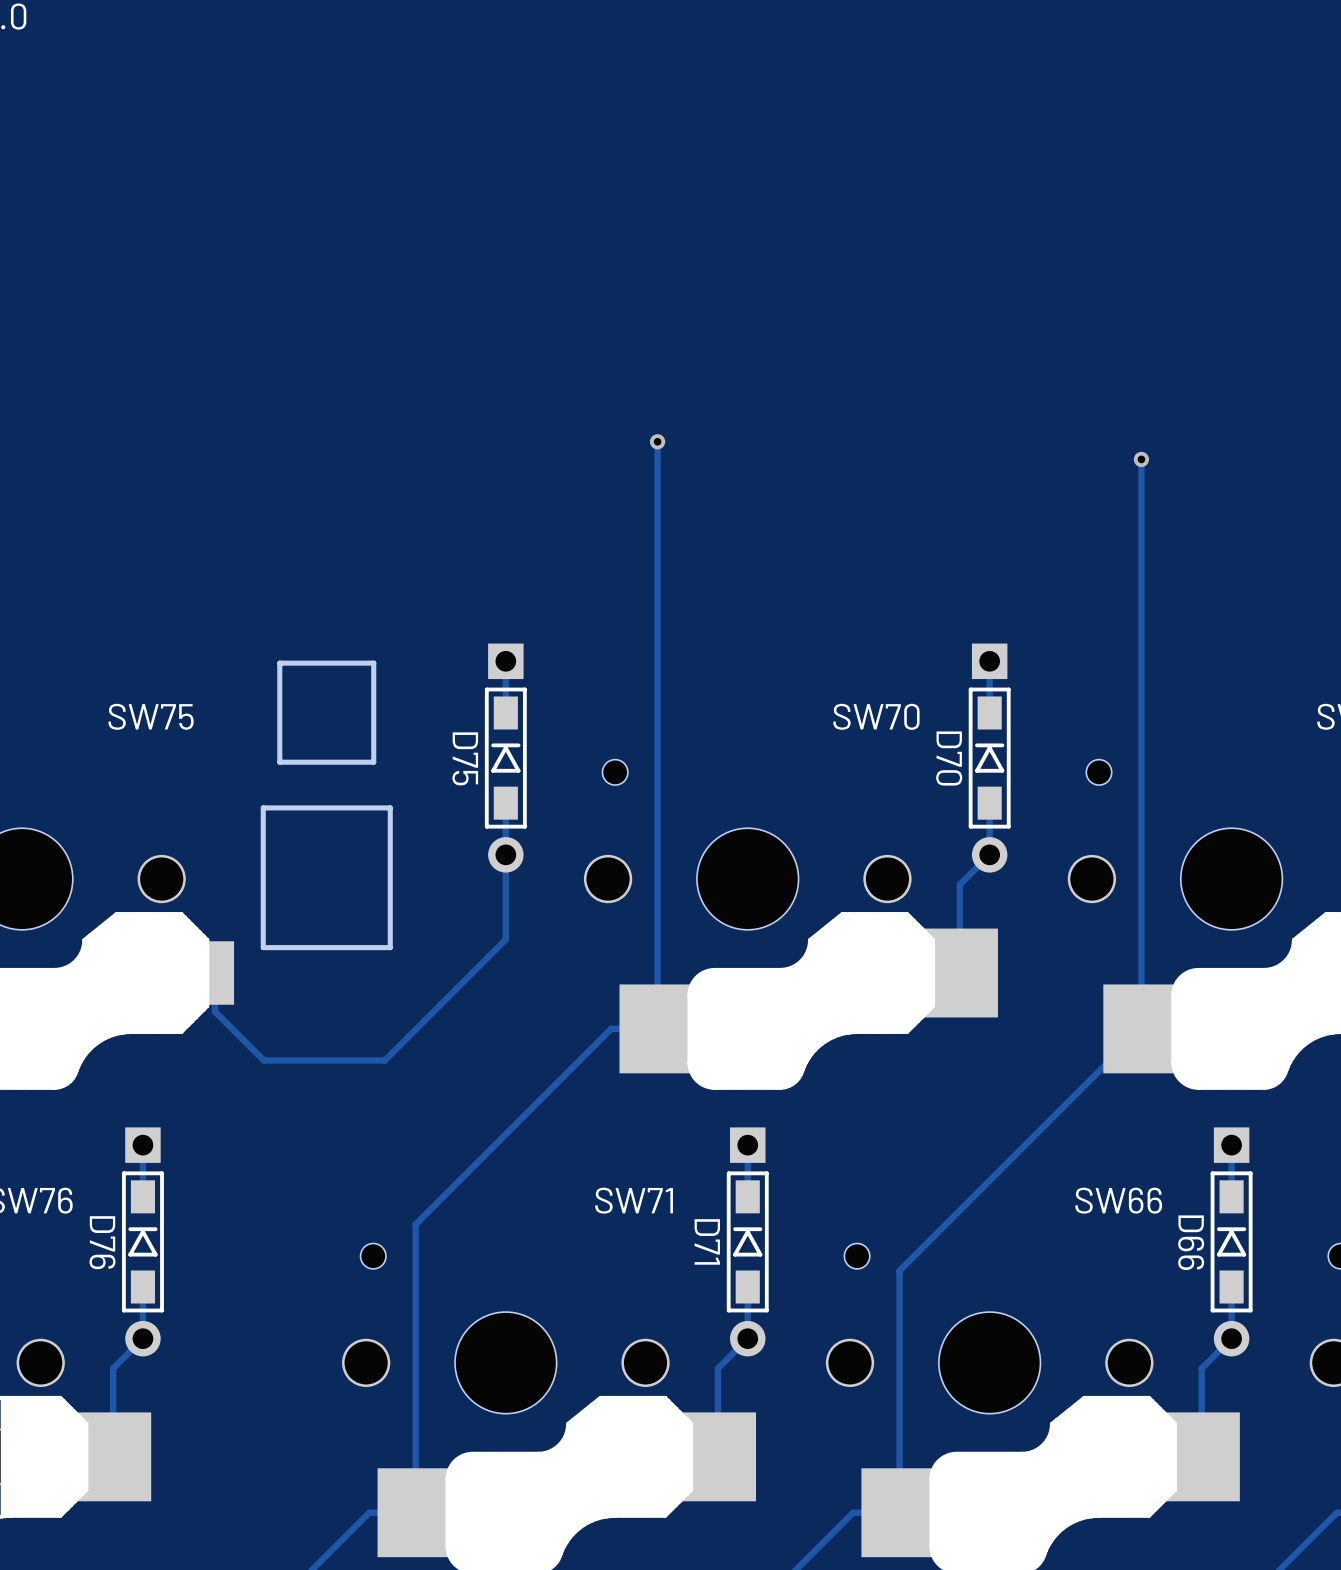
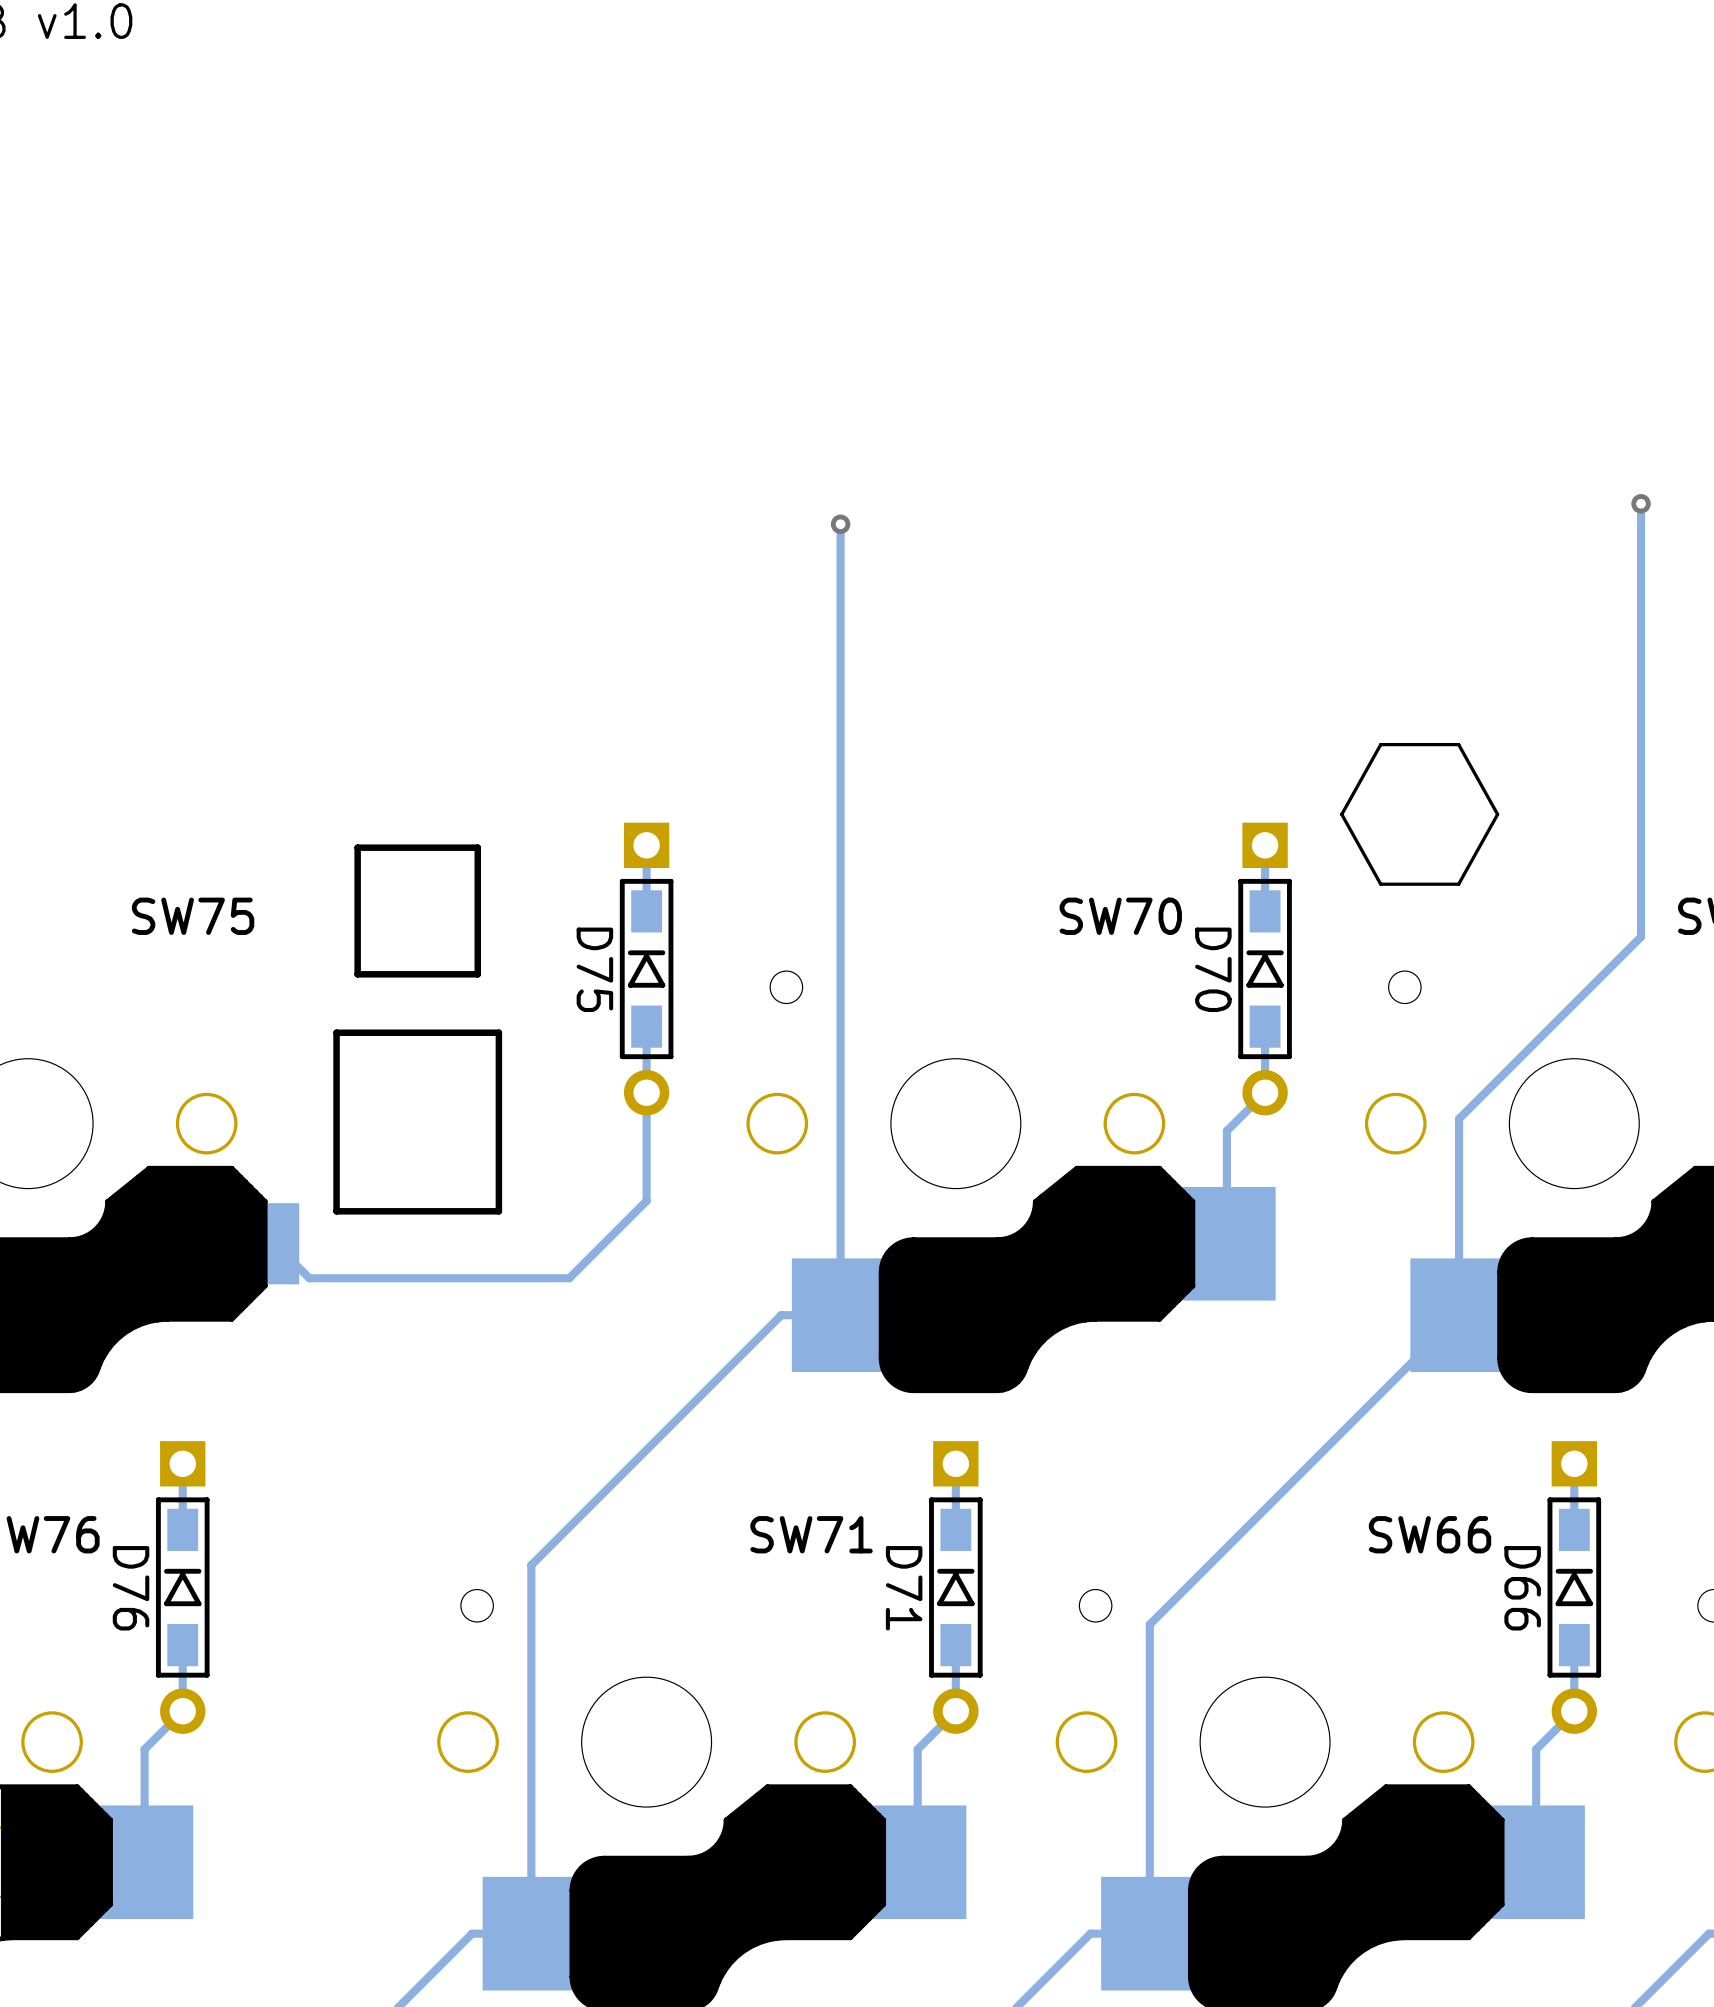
via: none -> (1641, 503)
track: (657, 441) (657, 1028) -> (840, 524) (840, 1315)
via position: (657, 441) -> (840, 524)
track: (1141, 459) (1141, 1028) (899, 1270) -> (1641, 503) (1641, 936) (1459, 1118) (1459, 1315) (1149, 1624)
via: (1141, 459) -> none
drawing: none -> [1340, 742, 1500, 886]
track: (215, 973) (215, 1011) (263, 1060) (384, 1060) (445, 999) -> (274, 1243) (309, 1278) (569, 1278)

